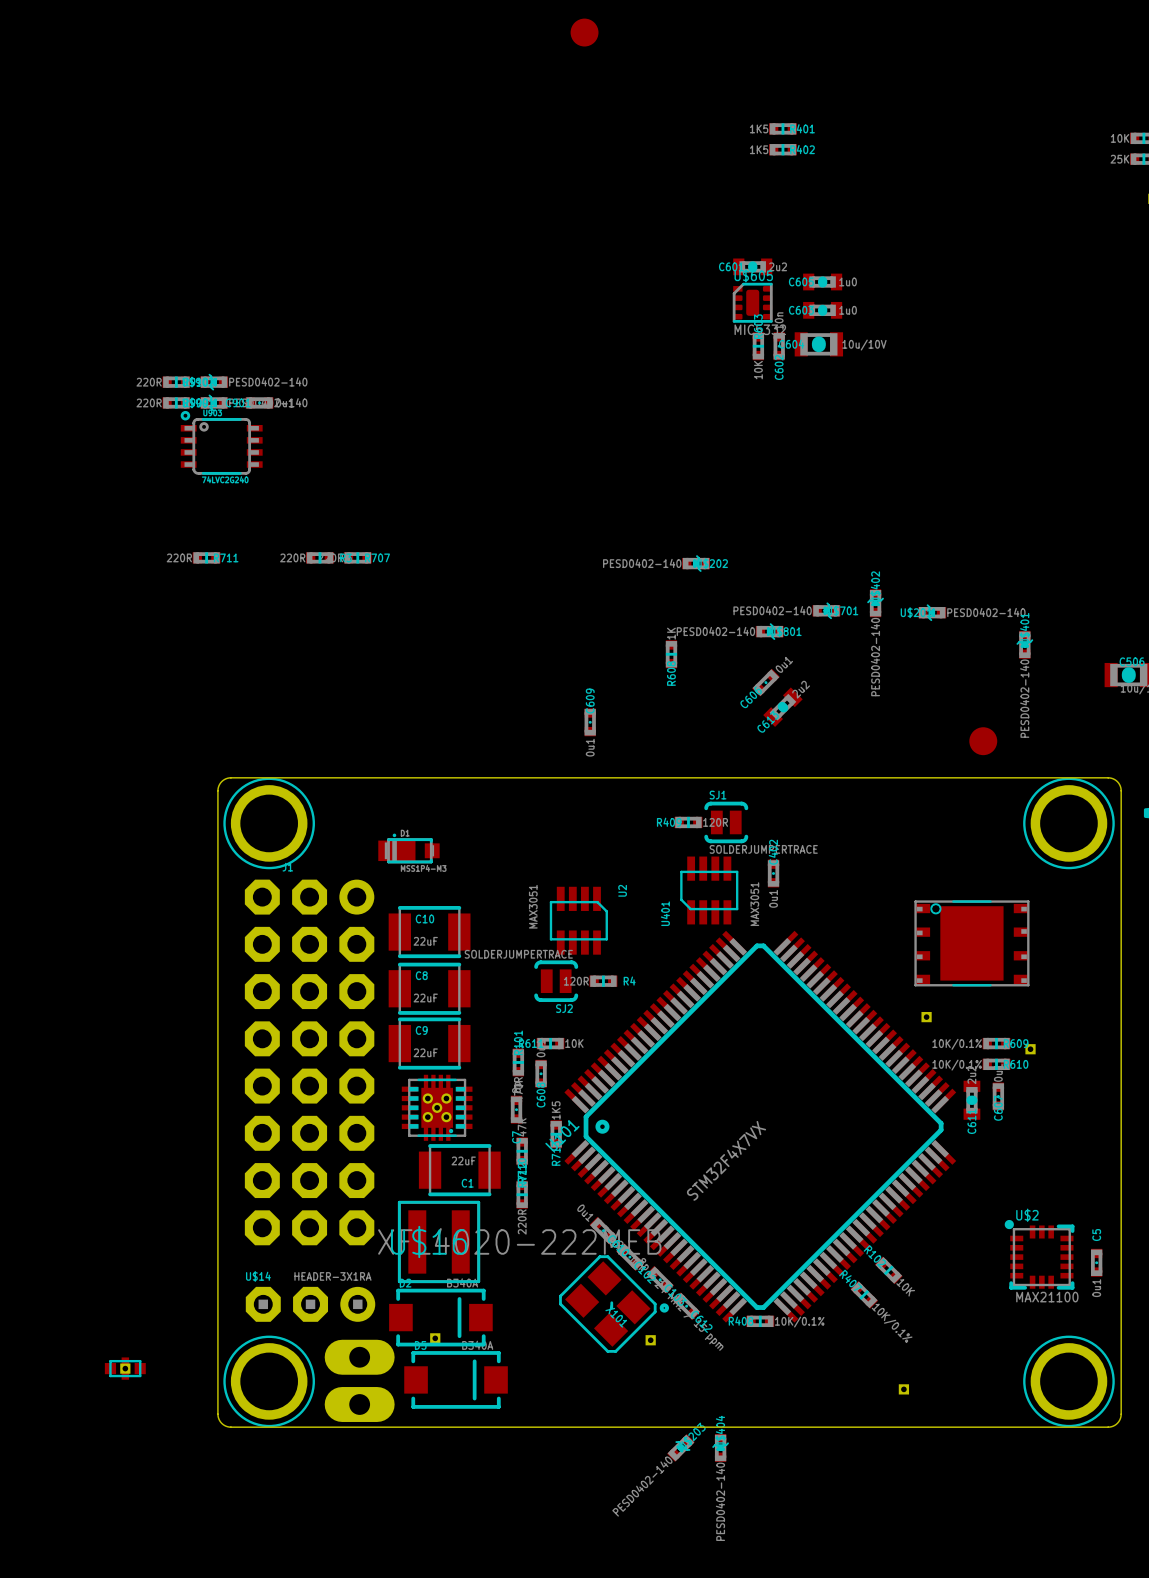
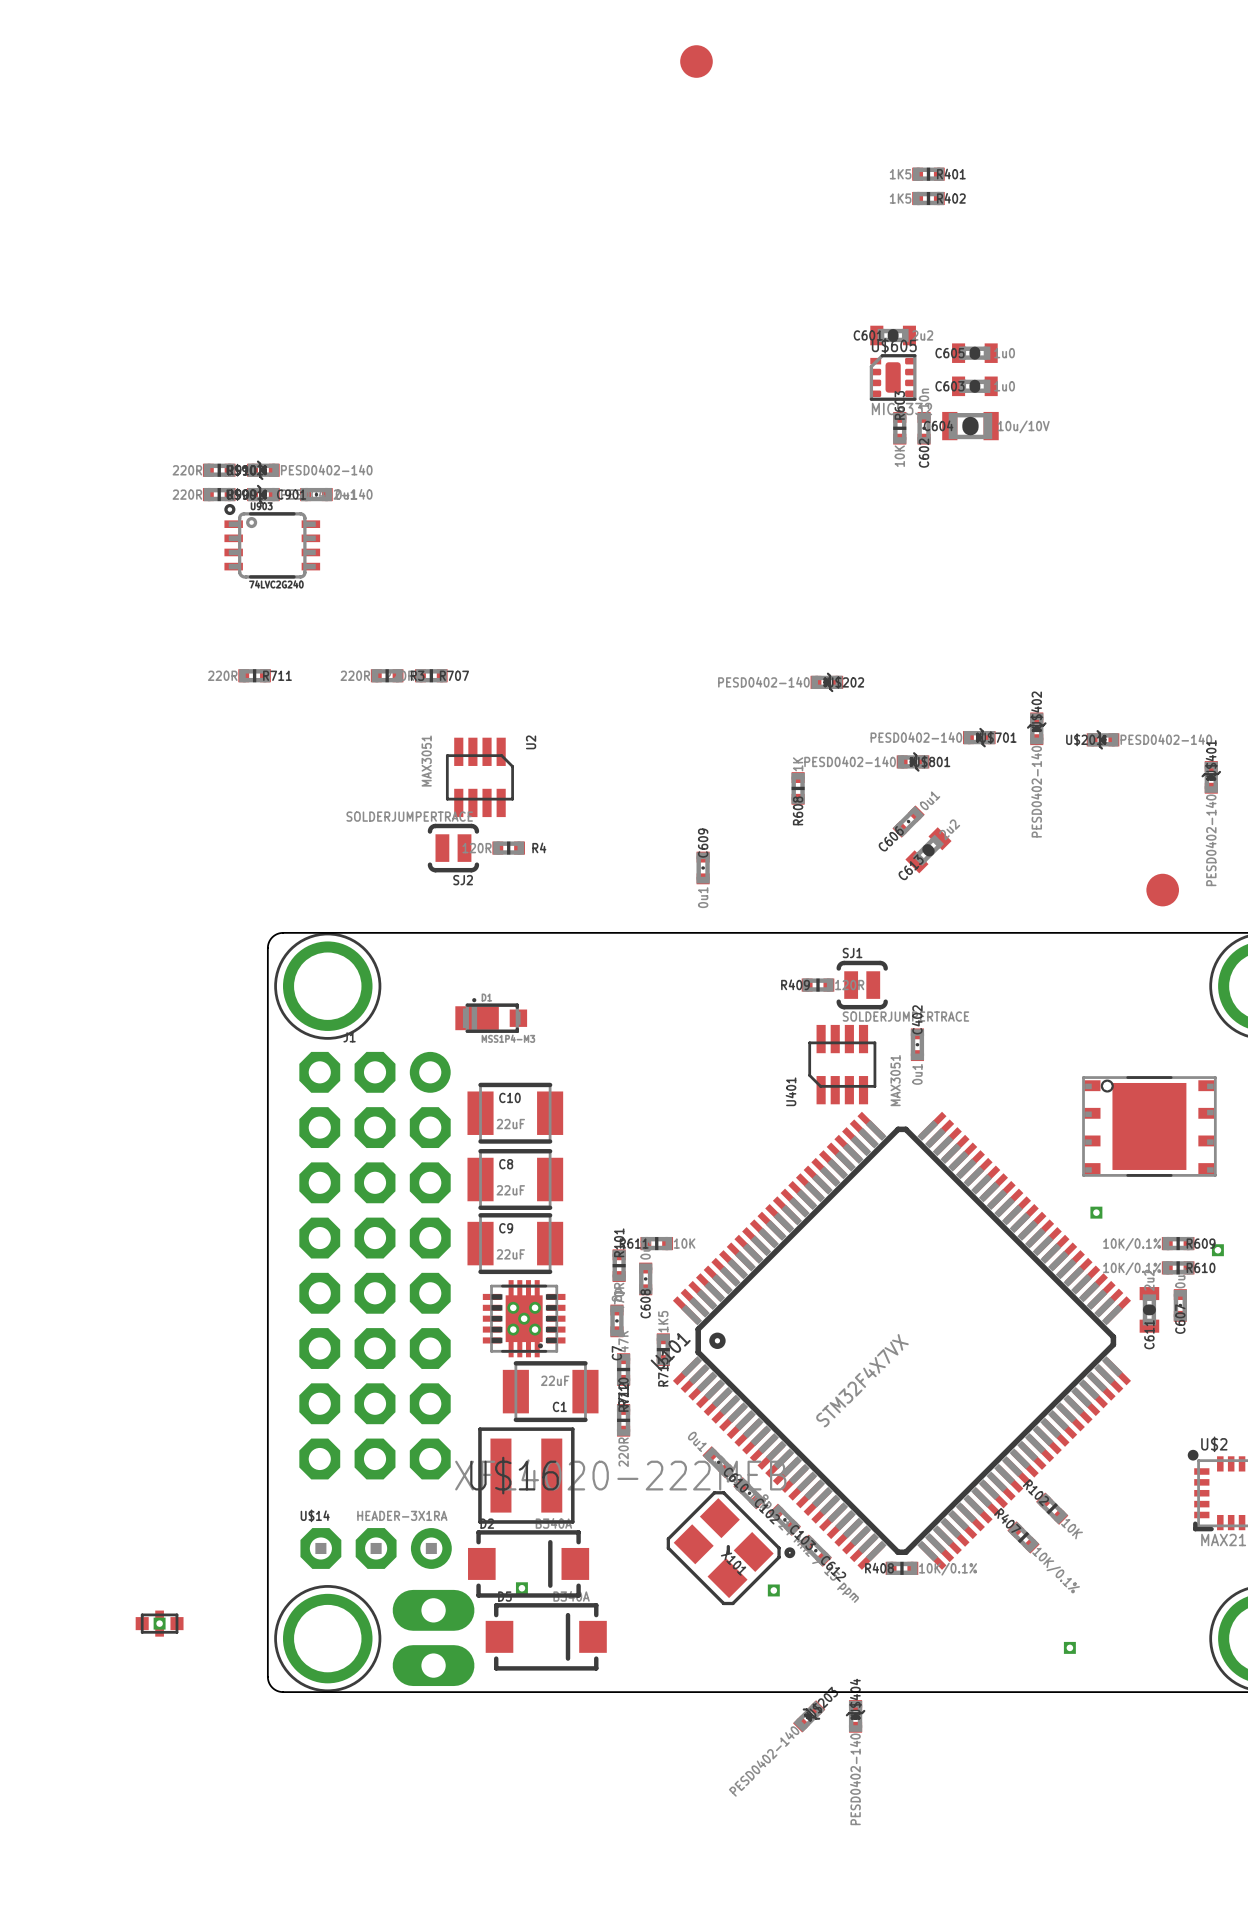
U2 position: (578, 920) -> (479, 777)
SJ2 position: (556, 981) -> (453, 848)
R4 position: (603, 981) -> (508, 848)

